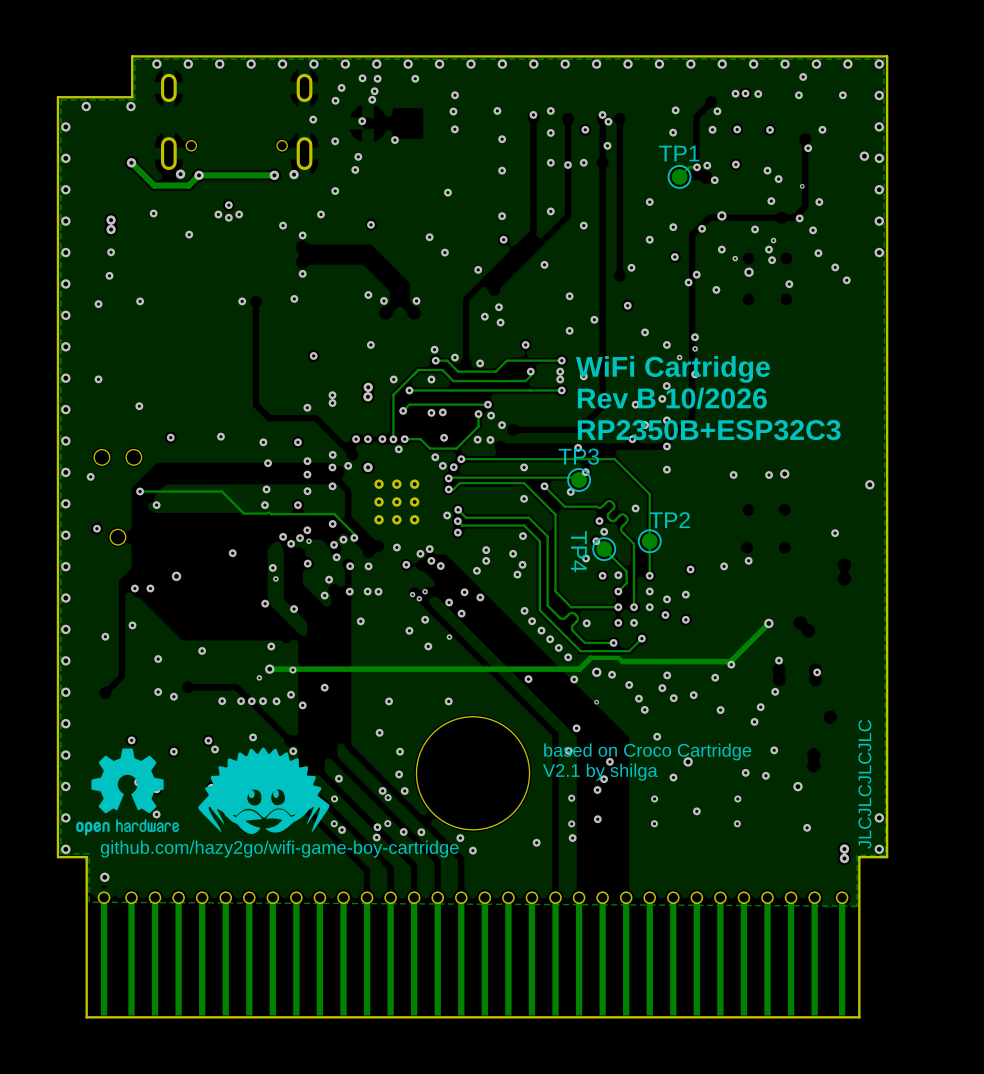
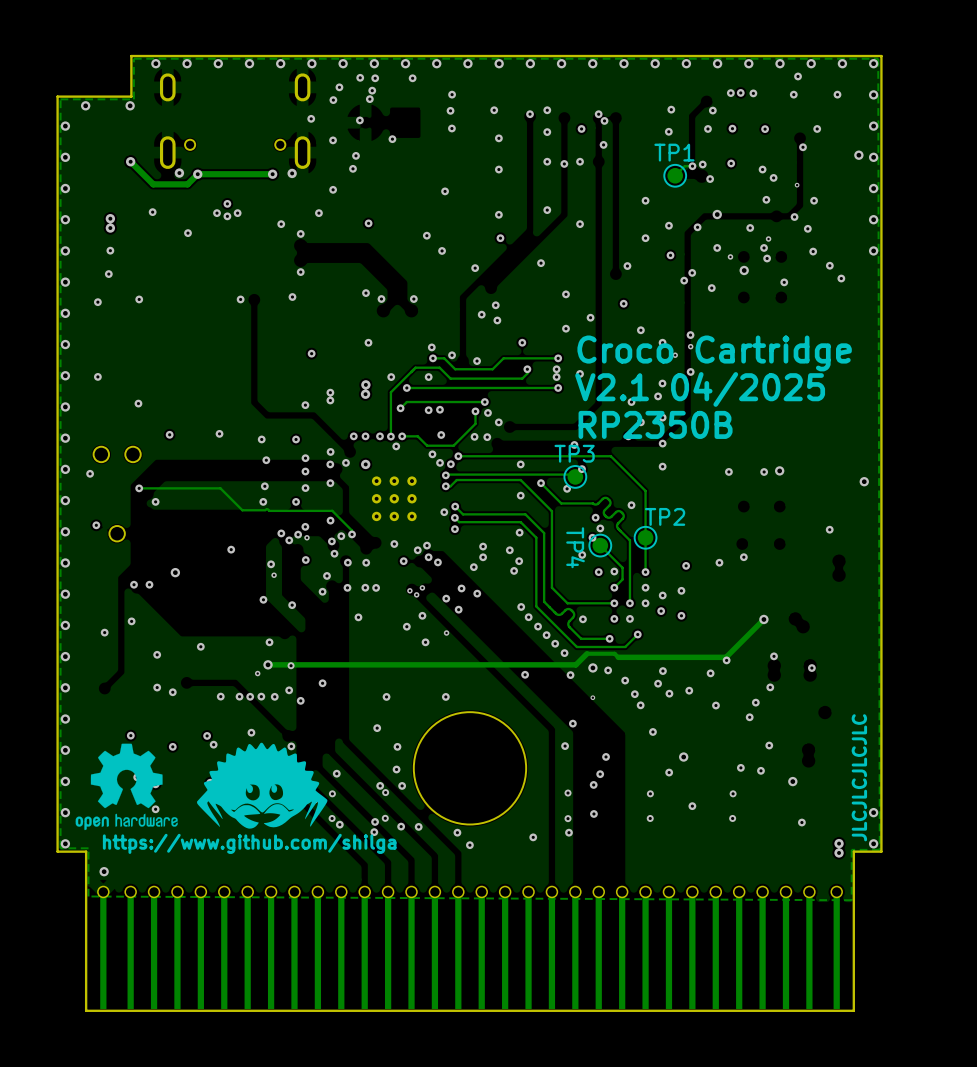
text: WiFi Cartridge (672, 369) -> Croco Cartridge (714, 353)
text: Rev B 10/2026 (672, 398) -> V2.1 04/2025 (700, 389)
text: RP2350B+ESP32C3 (709, 430) -> RP2350B (655, 424)
text: based on Croco Cartridge (647, 751) -> none
text: V2.1 by shilga (600, 772) -> none
text: github.com/hazy2go/wifi-game-boy-cartridge (279, 849) -> https://www.github.com/shilga (249, 843)

